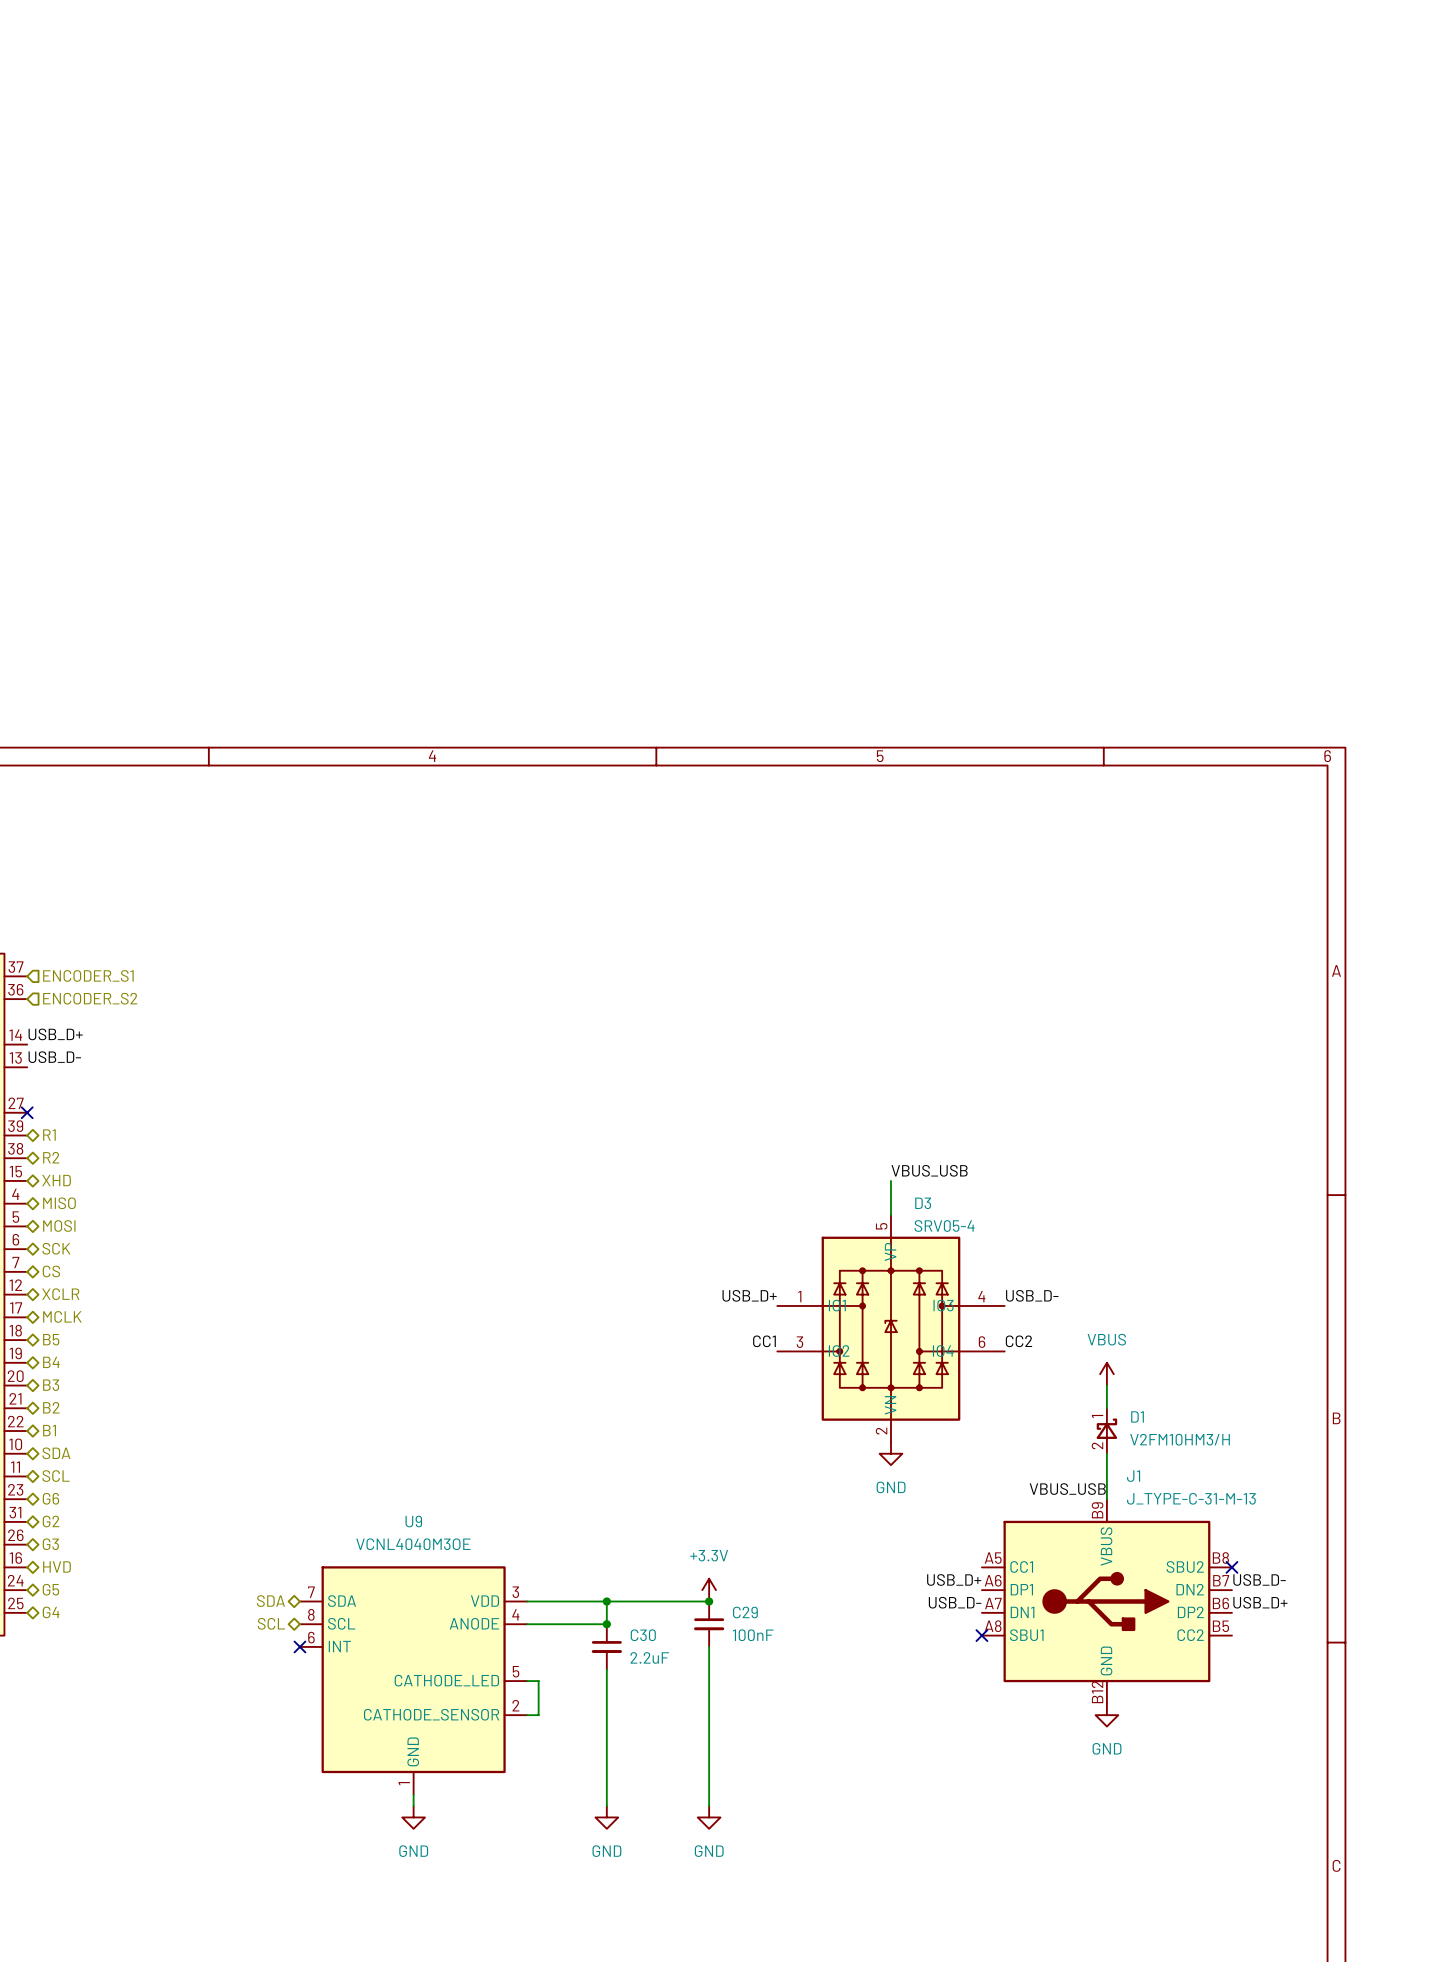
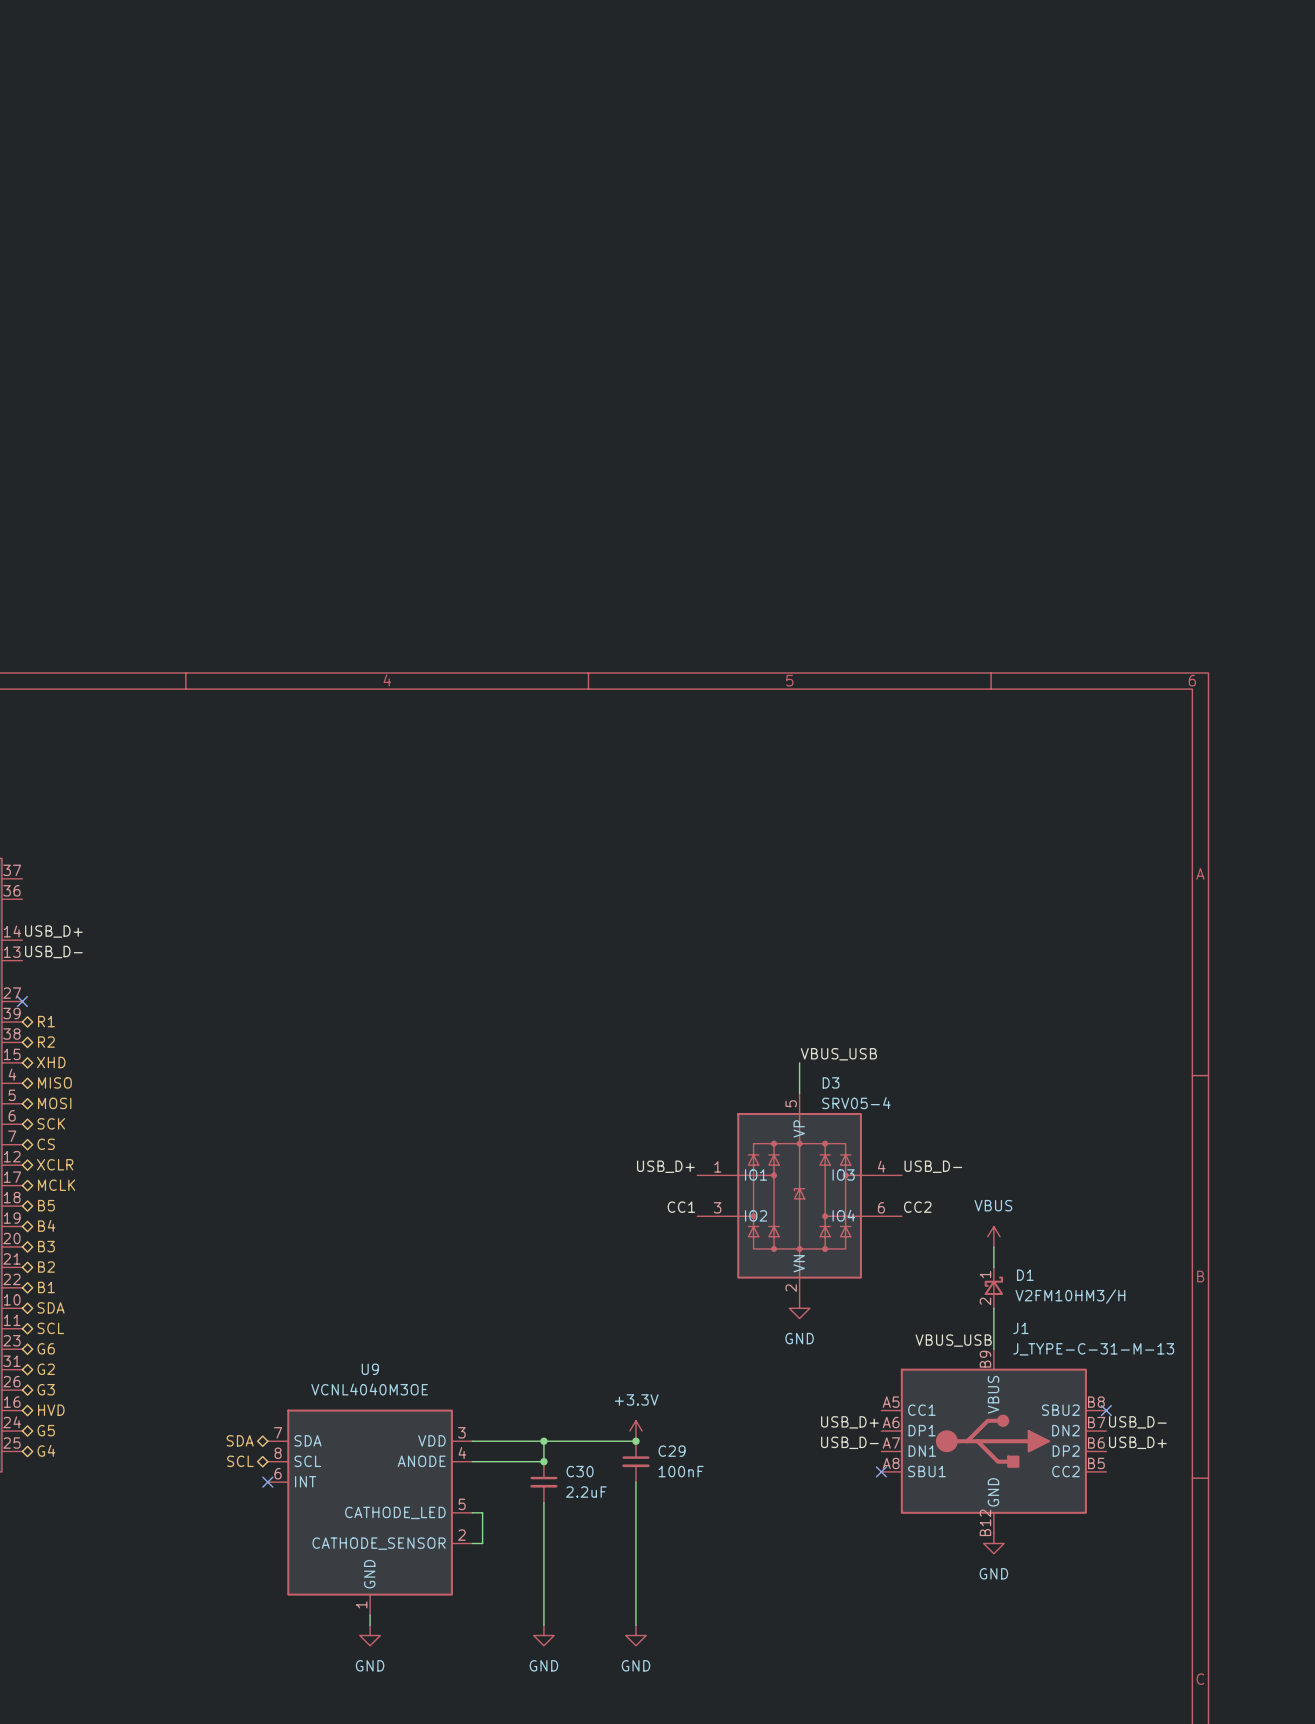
hierarchical label: ENCODER_S1 (88, 975) -> none
hierarchical label: ENCODER_S2 (90, 998) -> none

